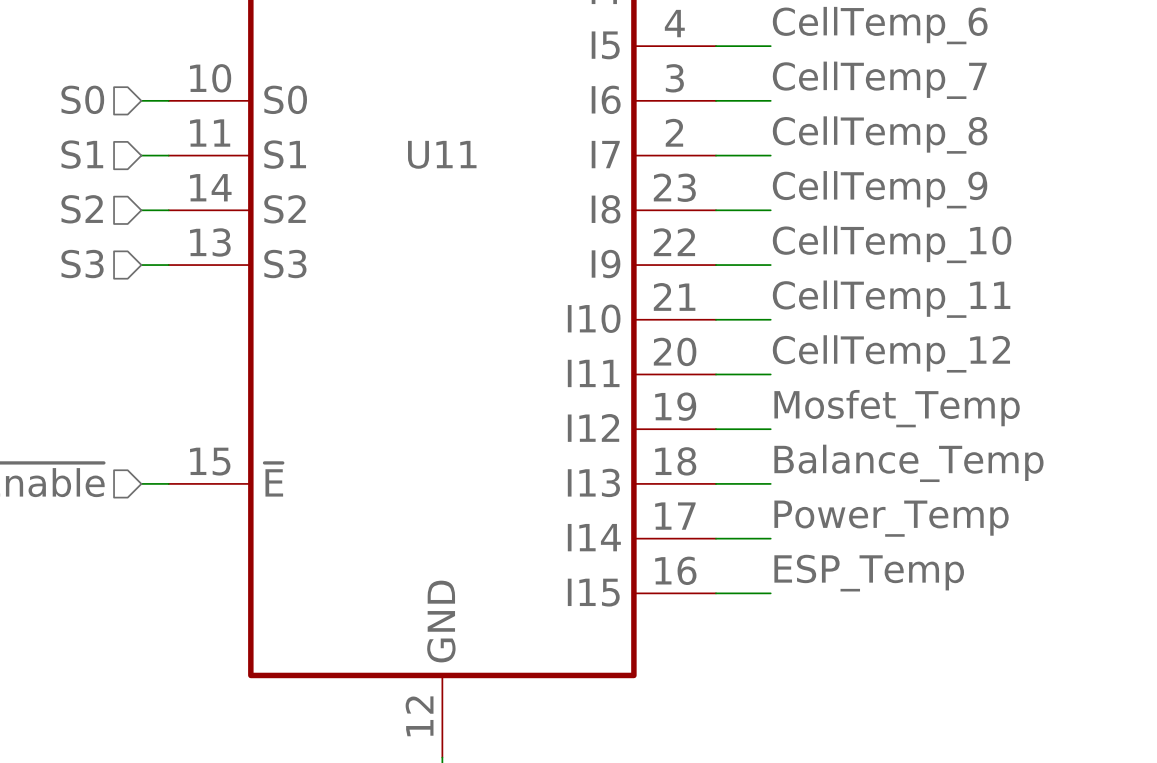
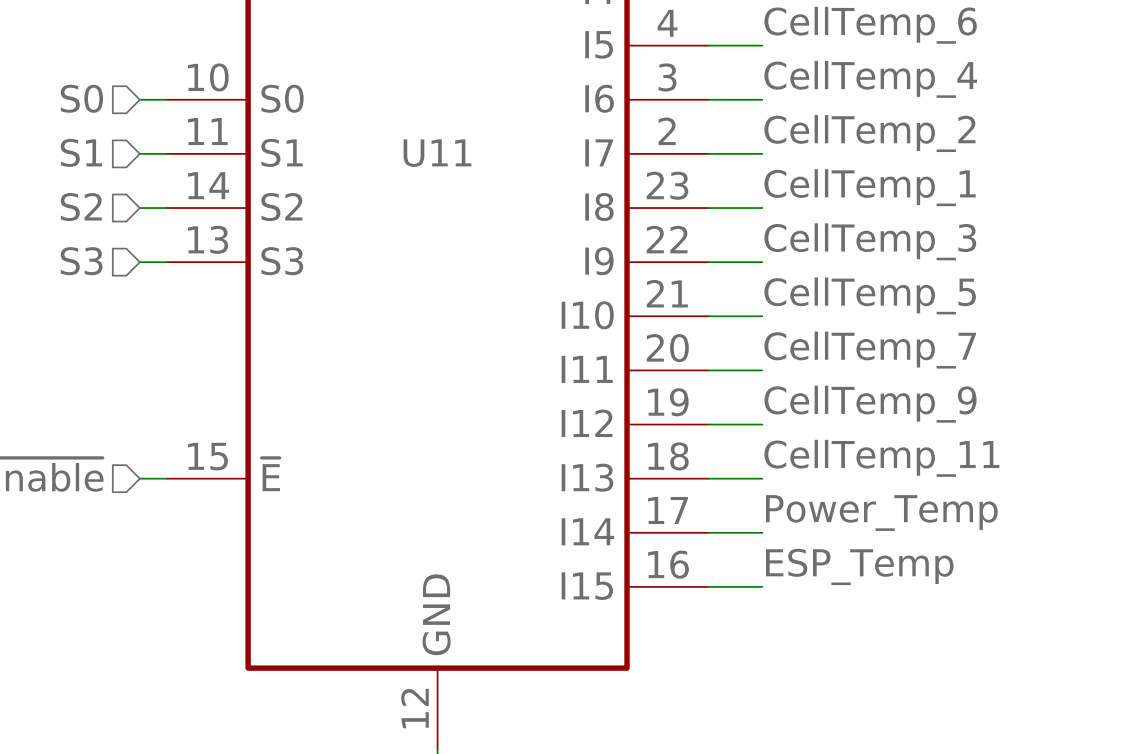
label: CellTemp_7 (879, 80) -> CellTemp_4 (870, 79)
label: CellTemp_8 (880, 135) -> CellTemp_2 (869, 133)
label: CellTemp_9 (880, 189) -> CellTemp_1 (870, 187)
label: CellTemp_10 (892, 244) -> CellTemp_3 (870, 241)
label: CellTemp_11 (891, 299) -> CellTemp_5 (870, 295)
label: CellTemp_12 (891, 353) -> CellTemp_7 (870, 350)
label: Mosfet_Temp (897, 408) -> CellTemp_9 (870, 404)
label: Balance_Temp (908, 463) -> CellTemp_11 (881, 458)

